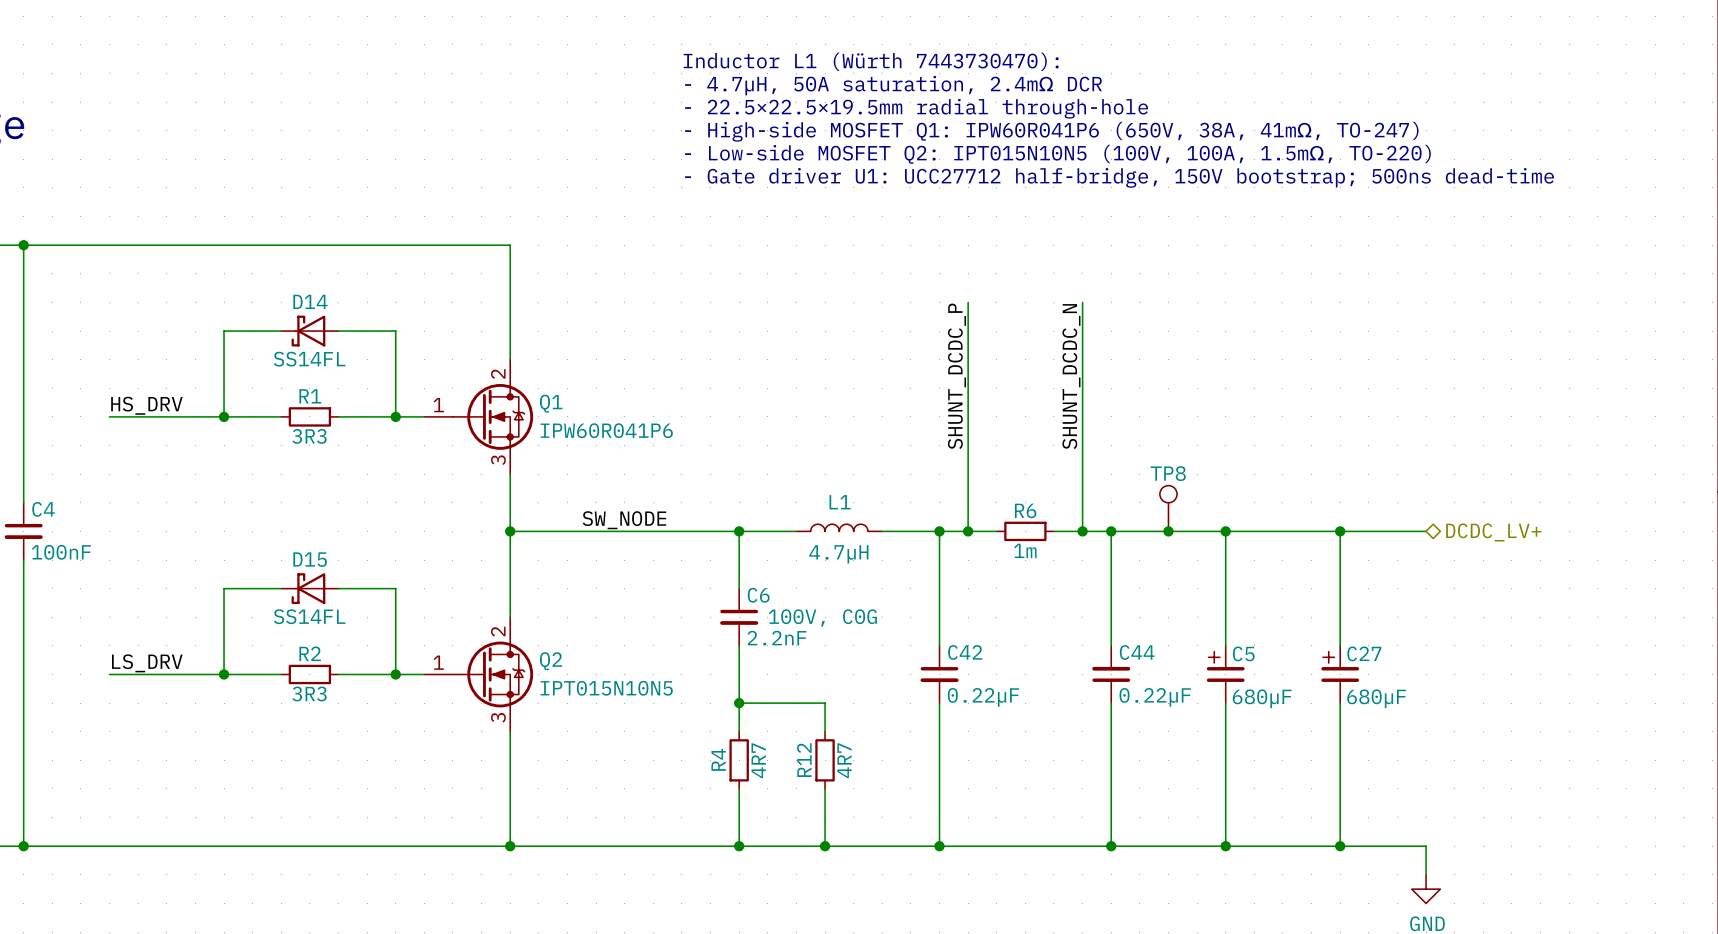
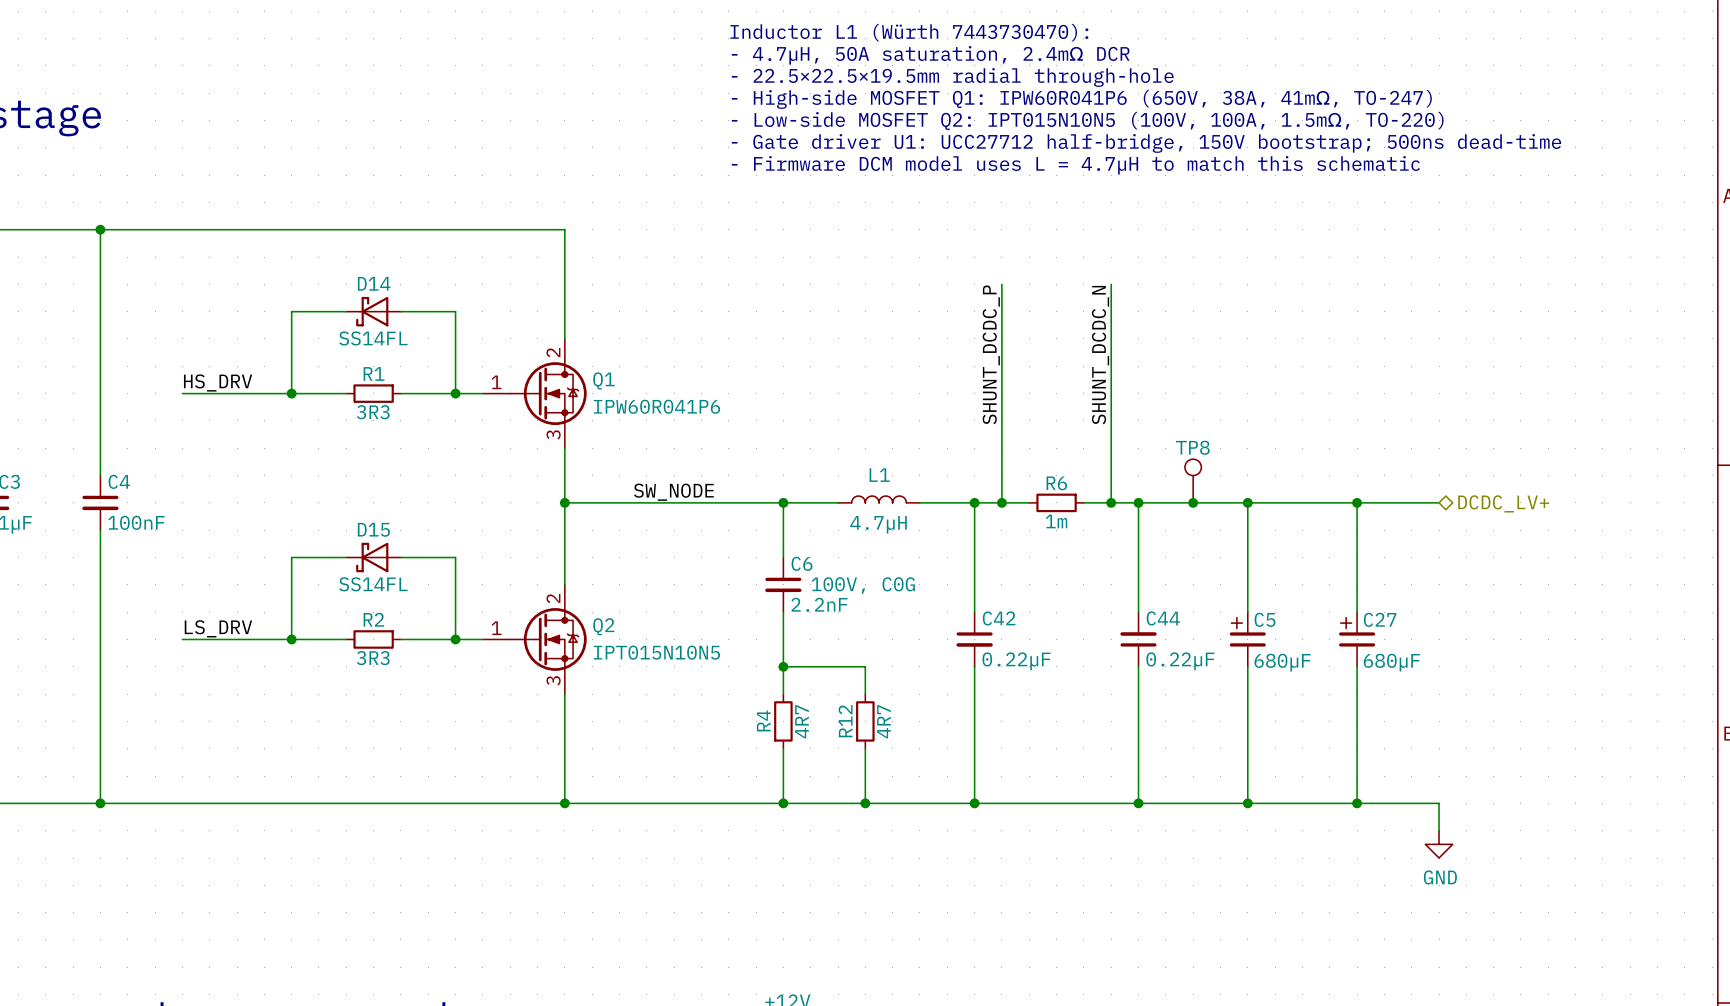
text: none -> Inductor L1 (Würth 7443730470): (909, 32)
text: Inductor L1 (Würth 7443730470): (871, 61) -> - 4.7µH, 50A saturation, 2.4mΩ DCR (930, 55)
text: - 4.7µH, 50A saturation, 2.4mΩ DCR (893, 85) -> - 22.5×22.5×19.5mm radial through-hole (952, 77)
text: - 22.5×22.5×19.5mm radial through-hole (916, 108) -> - High-side MOSFET Q1: IPW60R041P6 (650V, 38A, 41mΩ, TO-247) (1081, 99)
text: - High-side MOSFET Q1: IPW60R041P6 (650V, 38A, 41mΩ, TO-247) (1051, 131) -> - Low-side MOSFET Q2: IPT015N10N5 (100V, 100A, 1.5mΩ, TO-220) (1087, 120)
text: - Low-side MOSFET Q2: IPT015N10N5 (100V, 100A, 1.5mΩ, TO-220) (1057, 154) -> - Gate driver U1: UCC27712 half-bridge, 150V bootstrap; 500ns dead-time (1146, 143)
text: - Gate driver U1: UCC27712 half-bridge, 150V bootstrap; 500ns dead-time (1119, 177) -> - Firmware DCM model uses L = 4.7µH to match this schematic (1075, 165)

